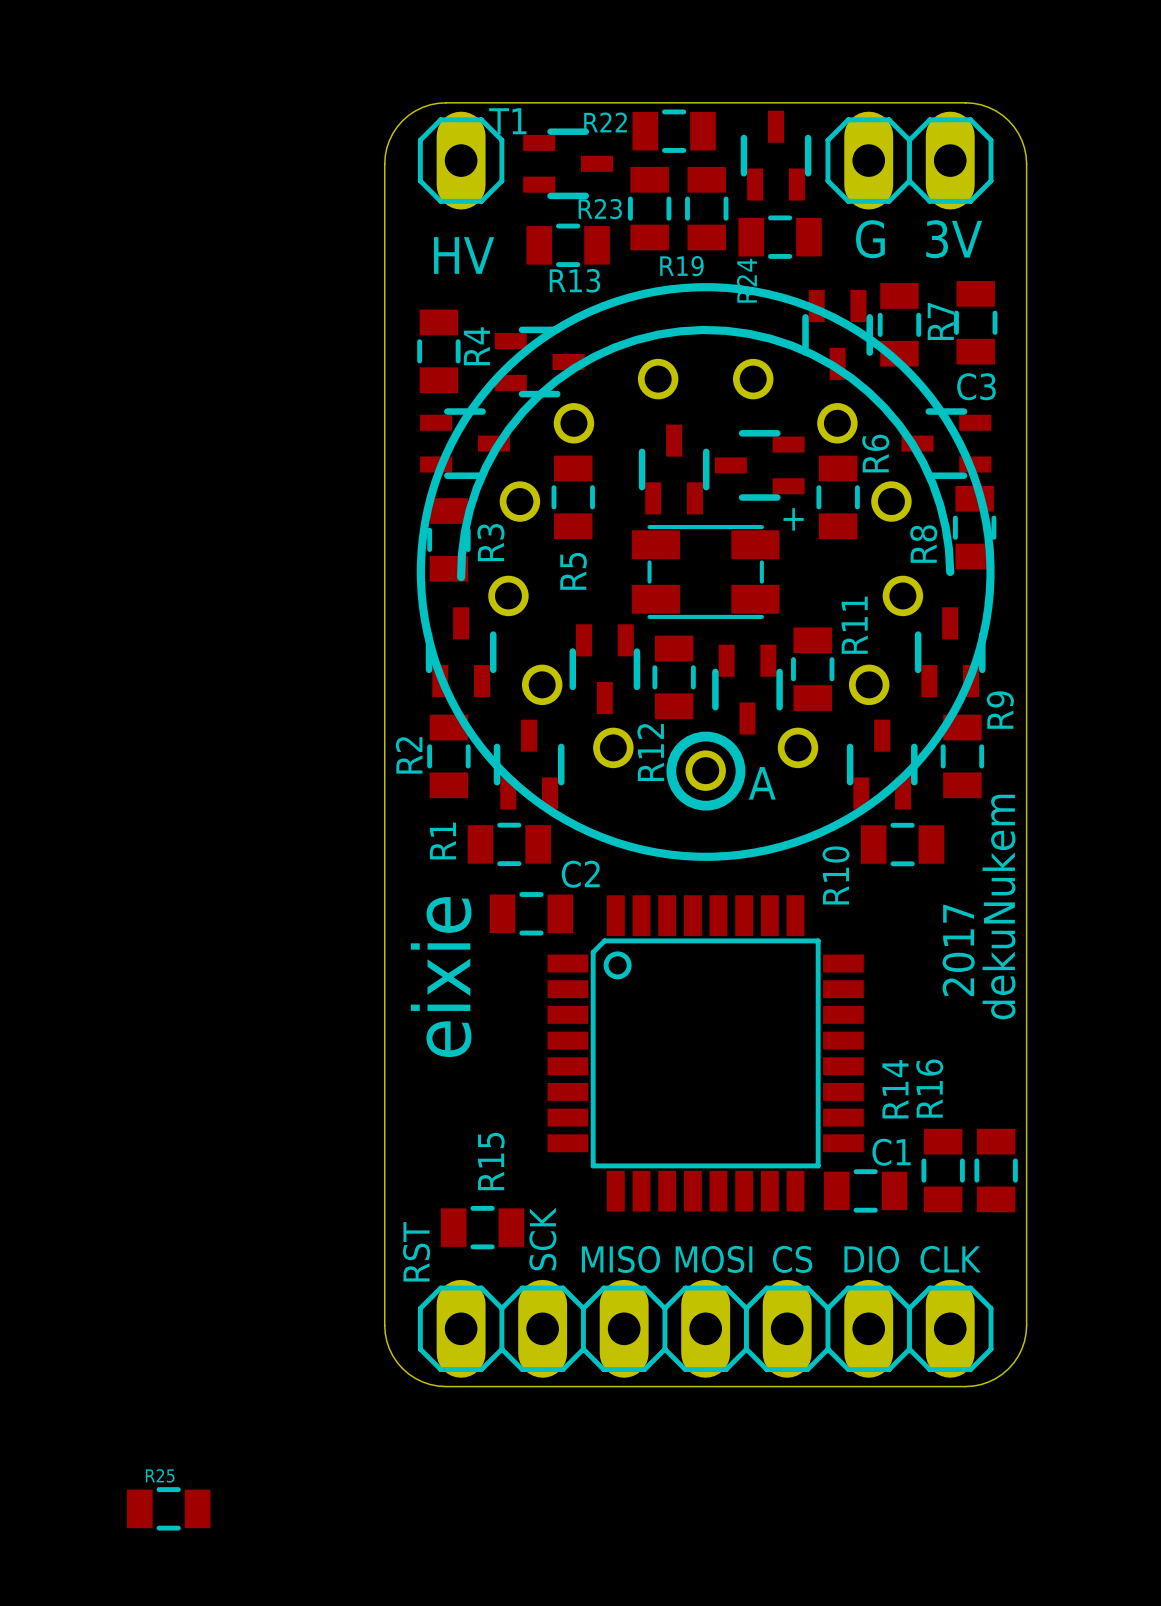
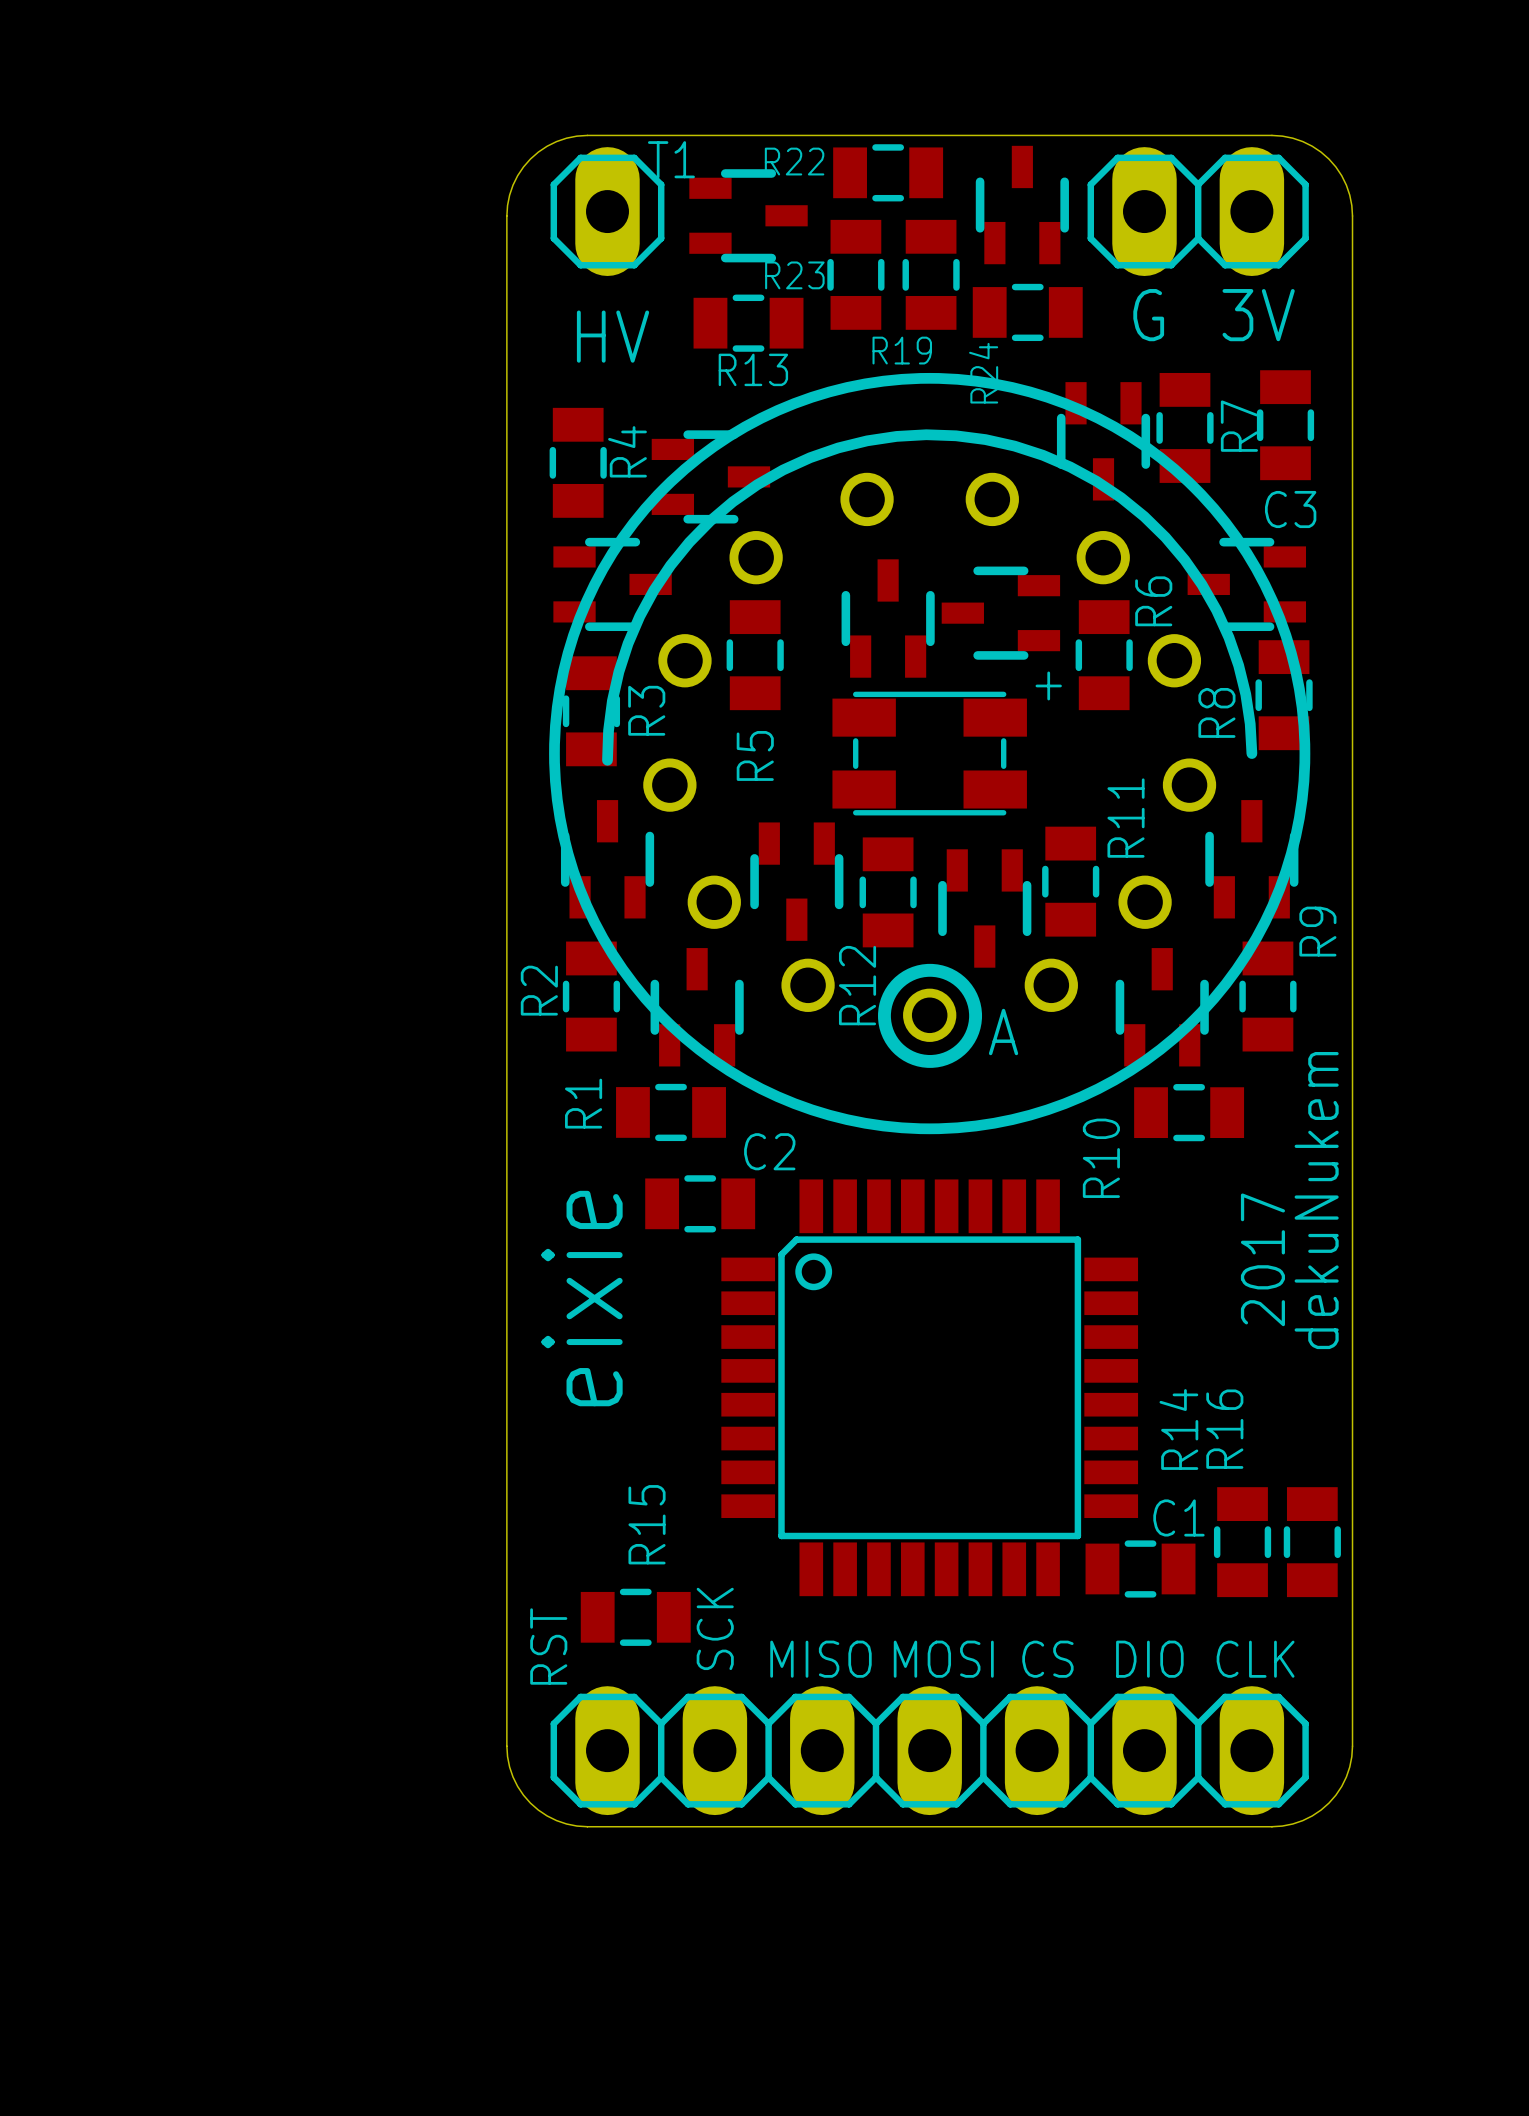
R25: (168, 1508) -> none

